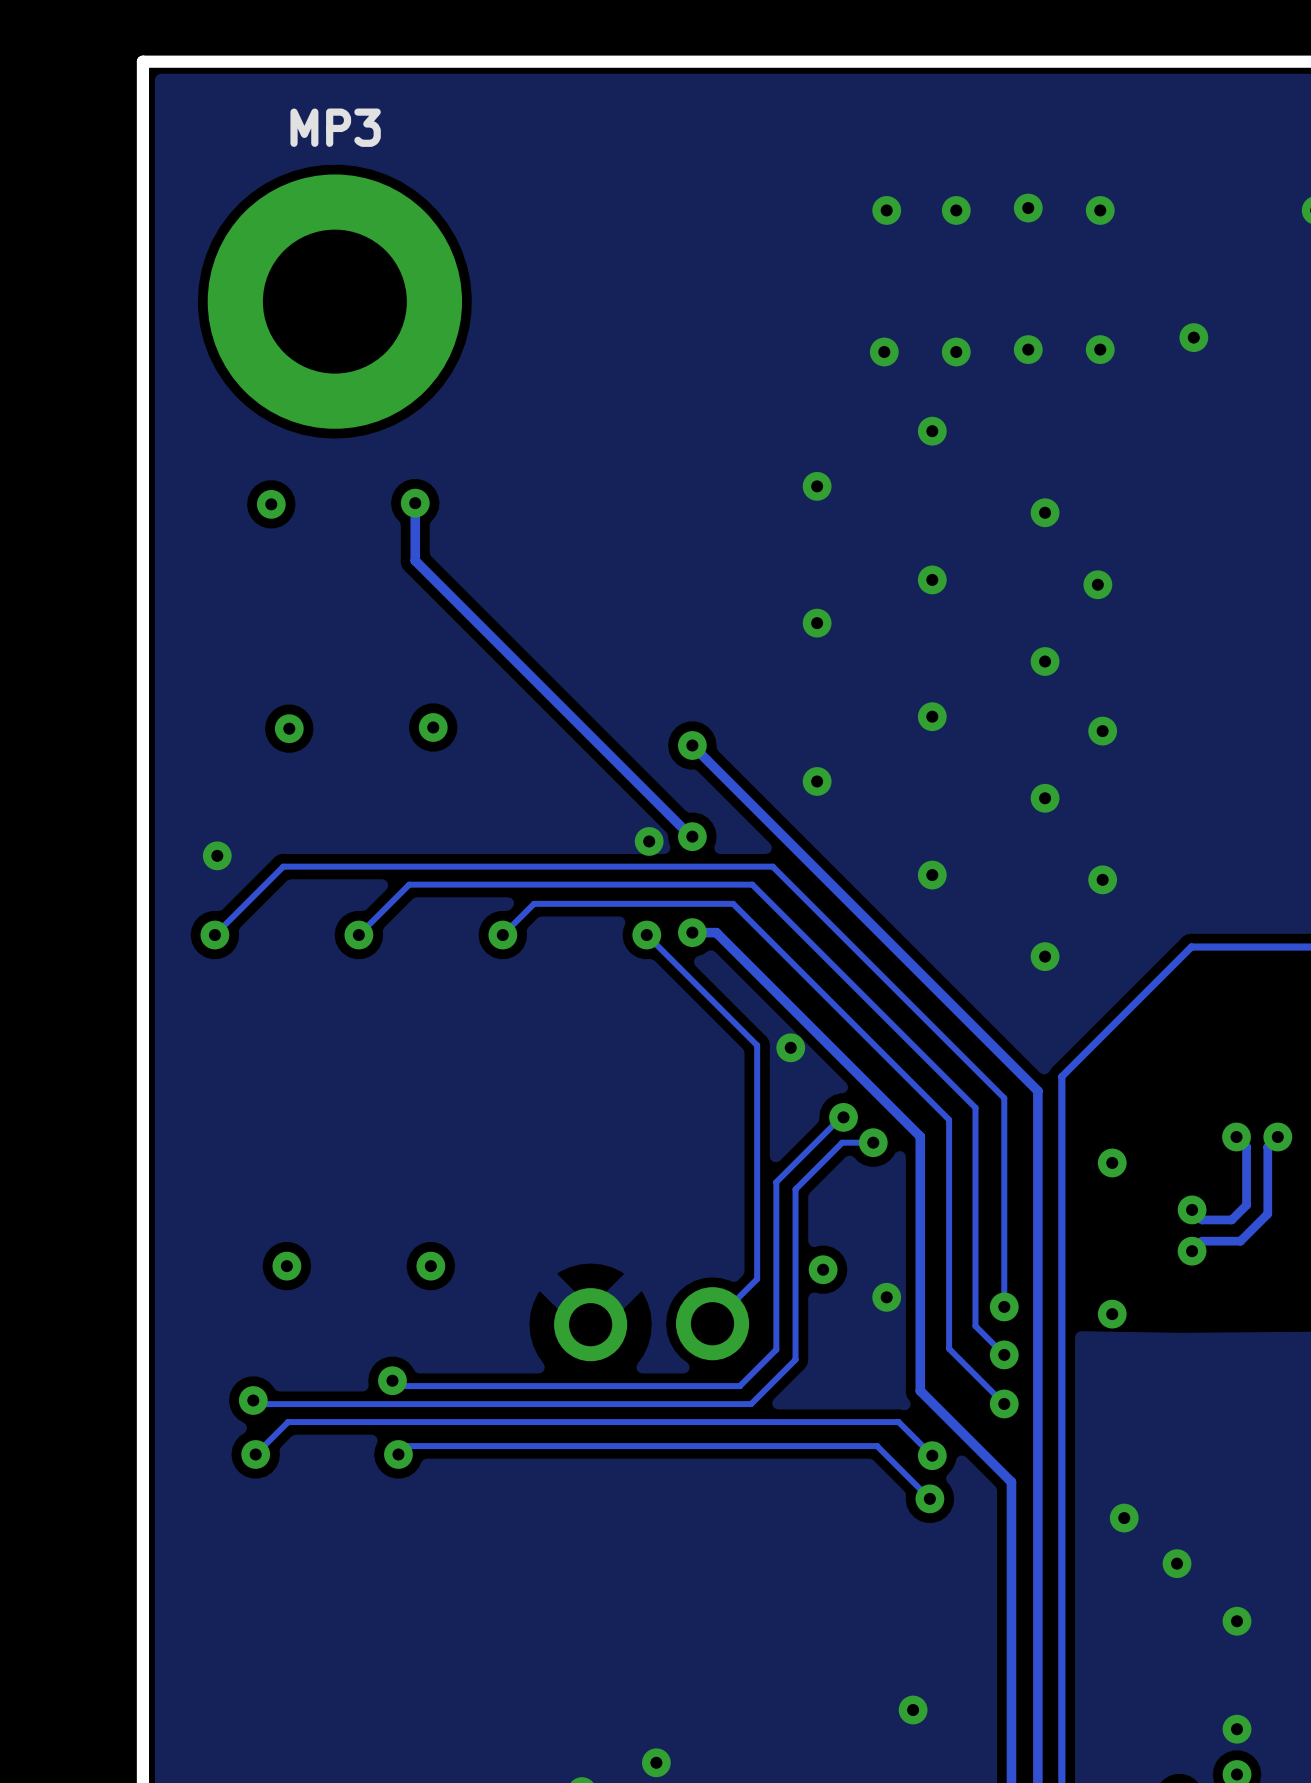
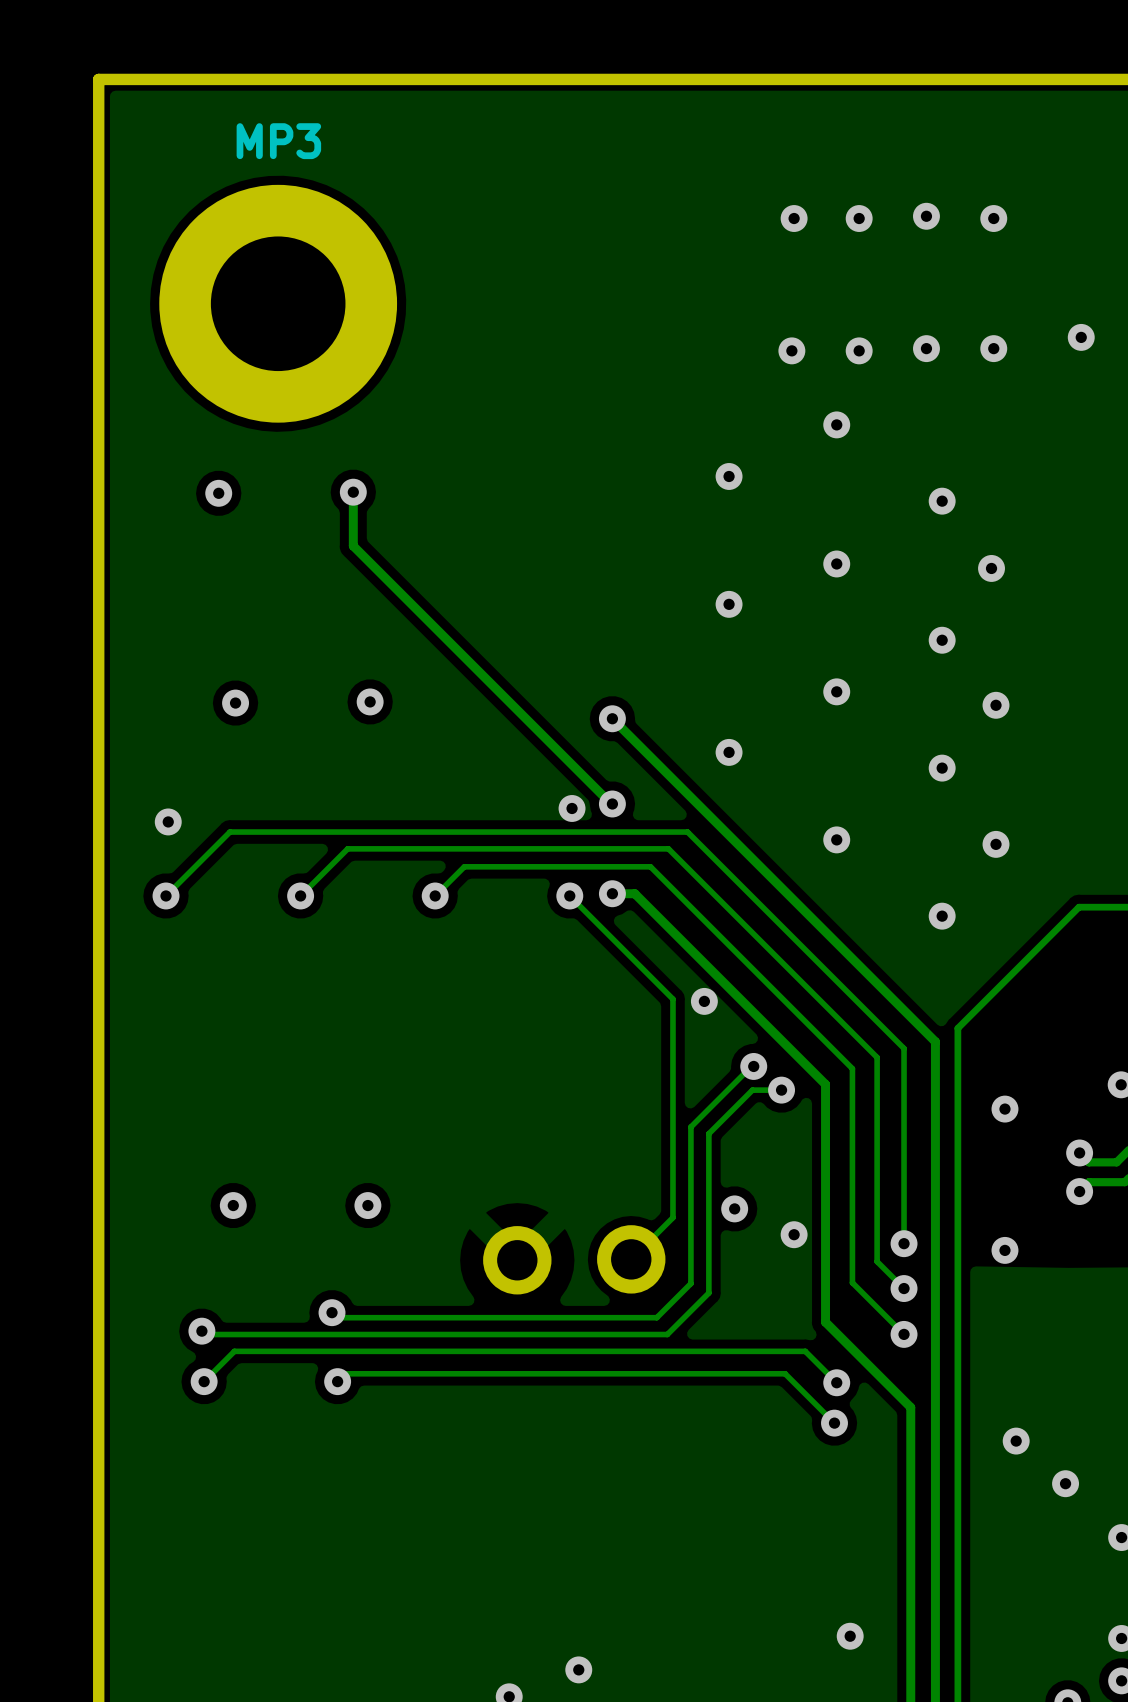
via position: (913, 1710) -> (850, 1636)

